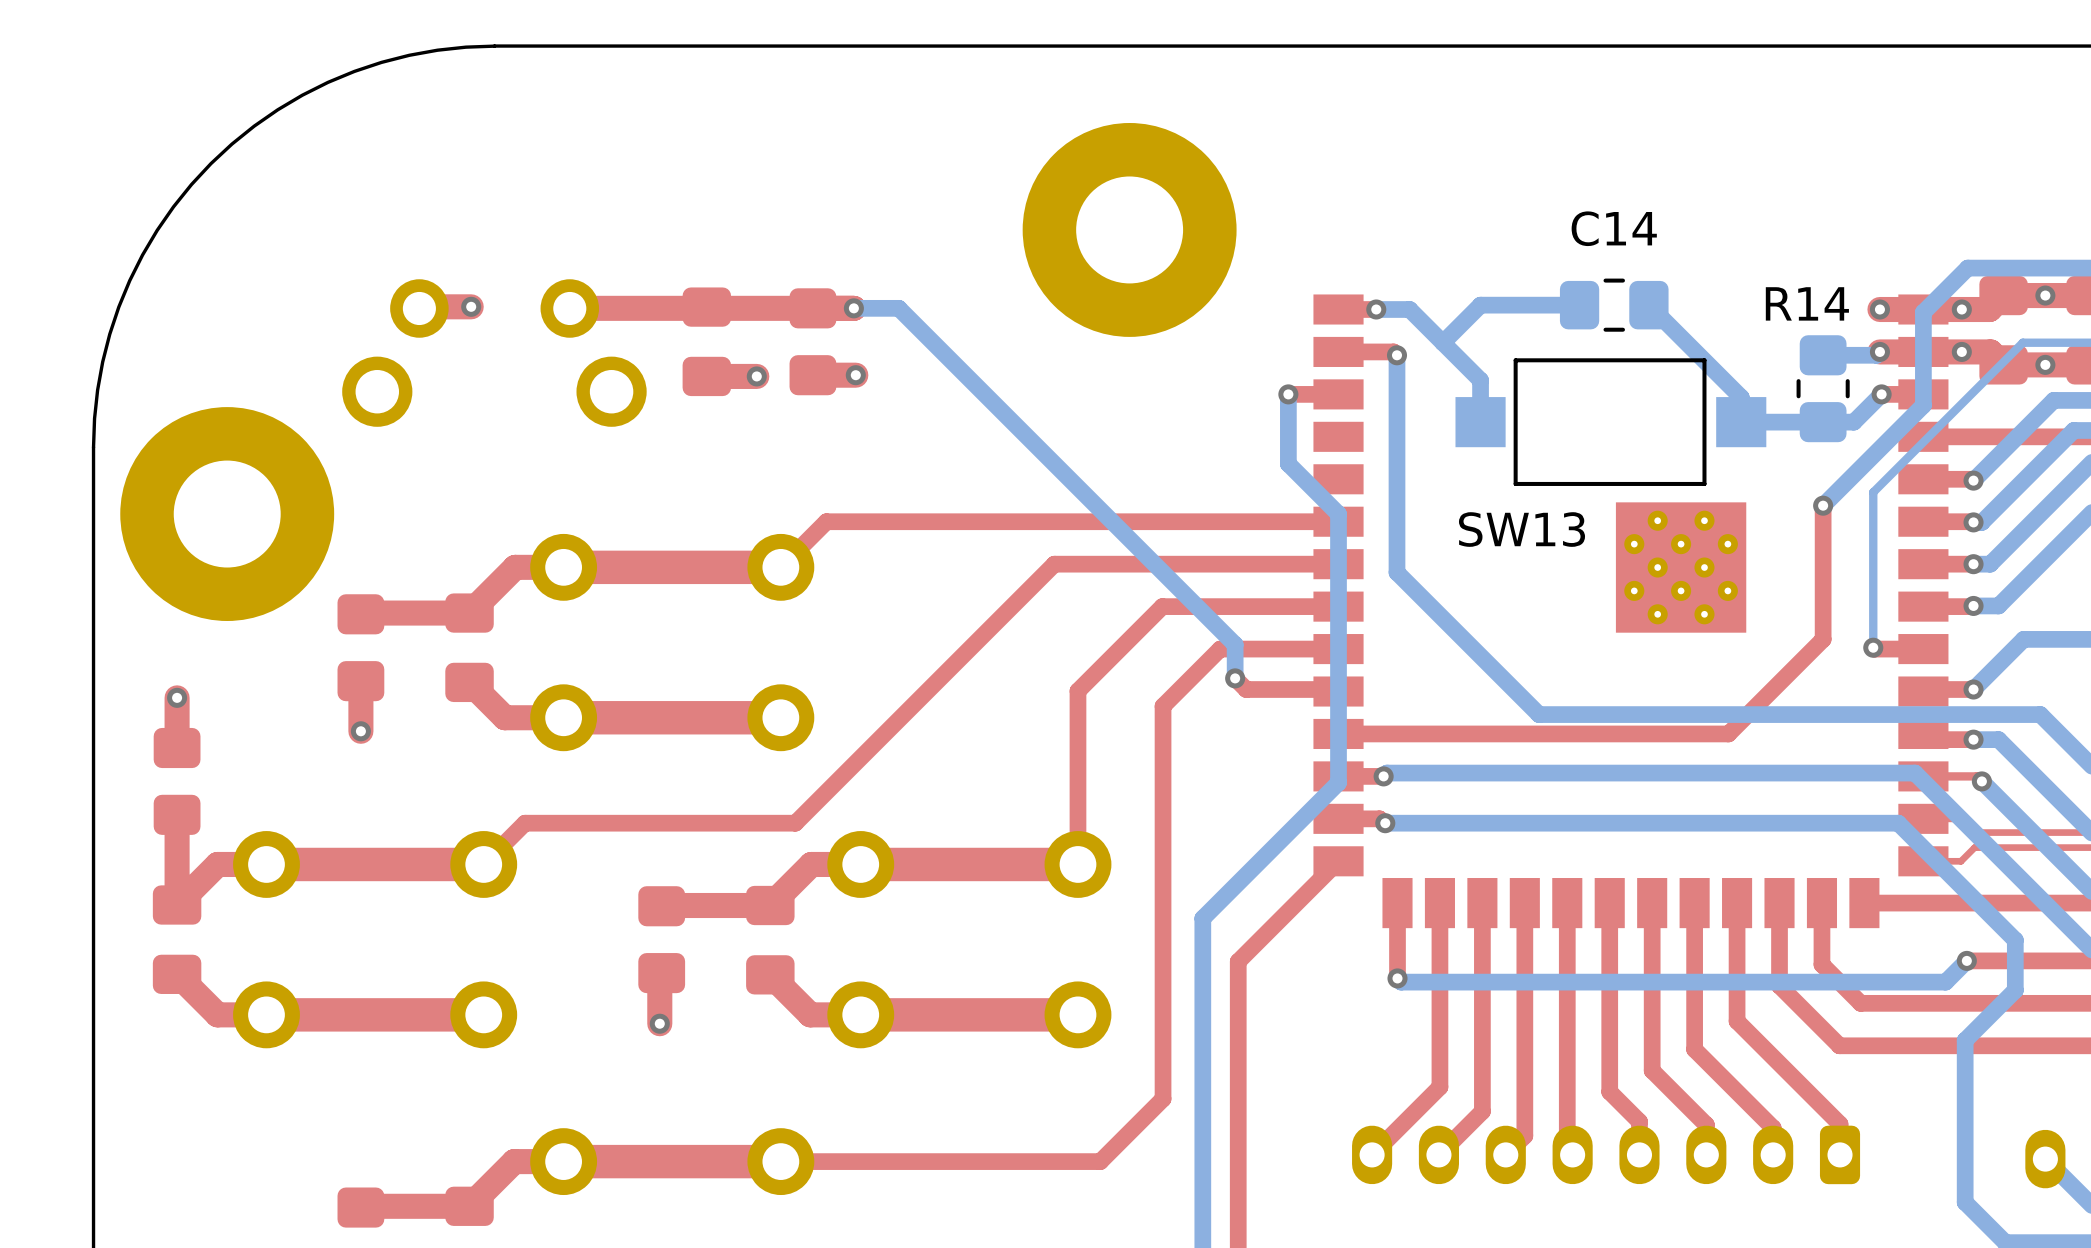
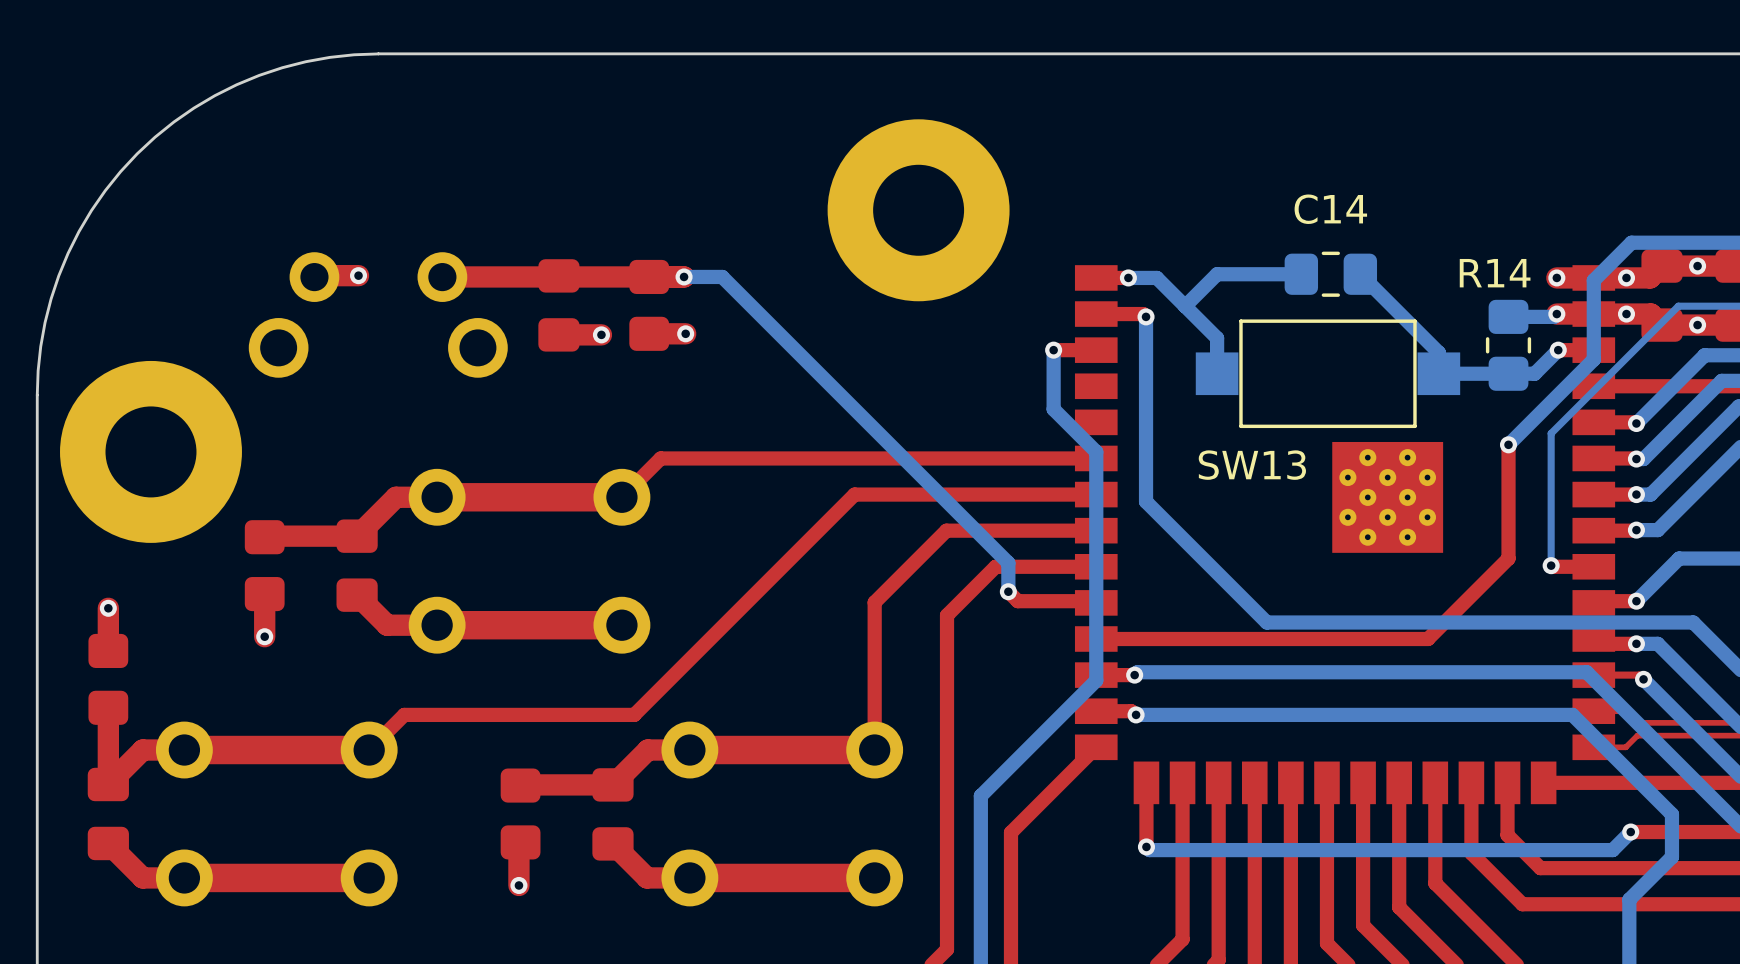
SW13 footprint: [1455, 358, 1767, 486] -> [1195, 319, 1461, 429]

